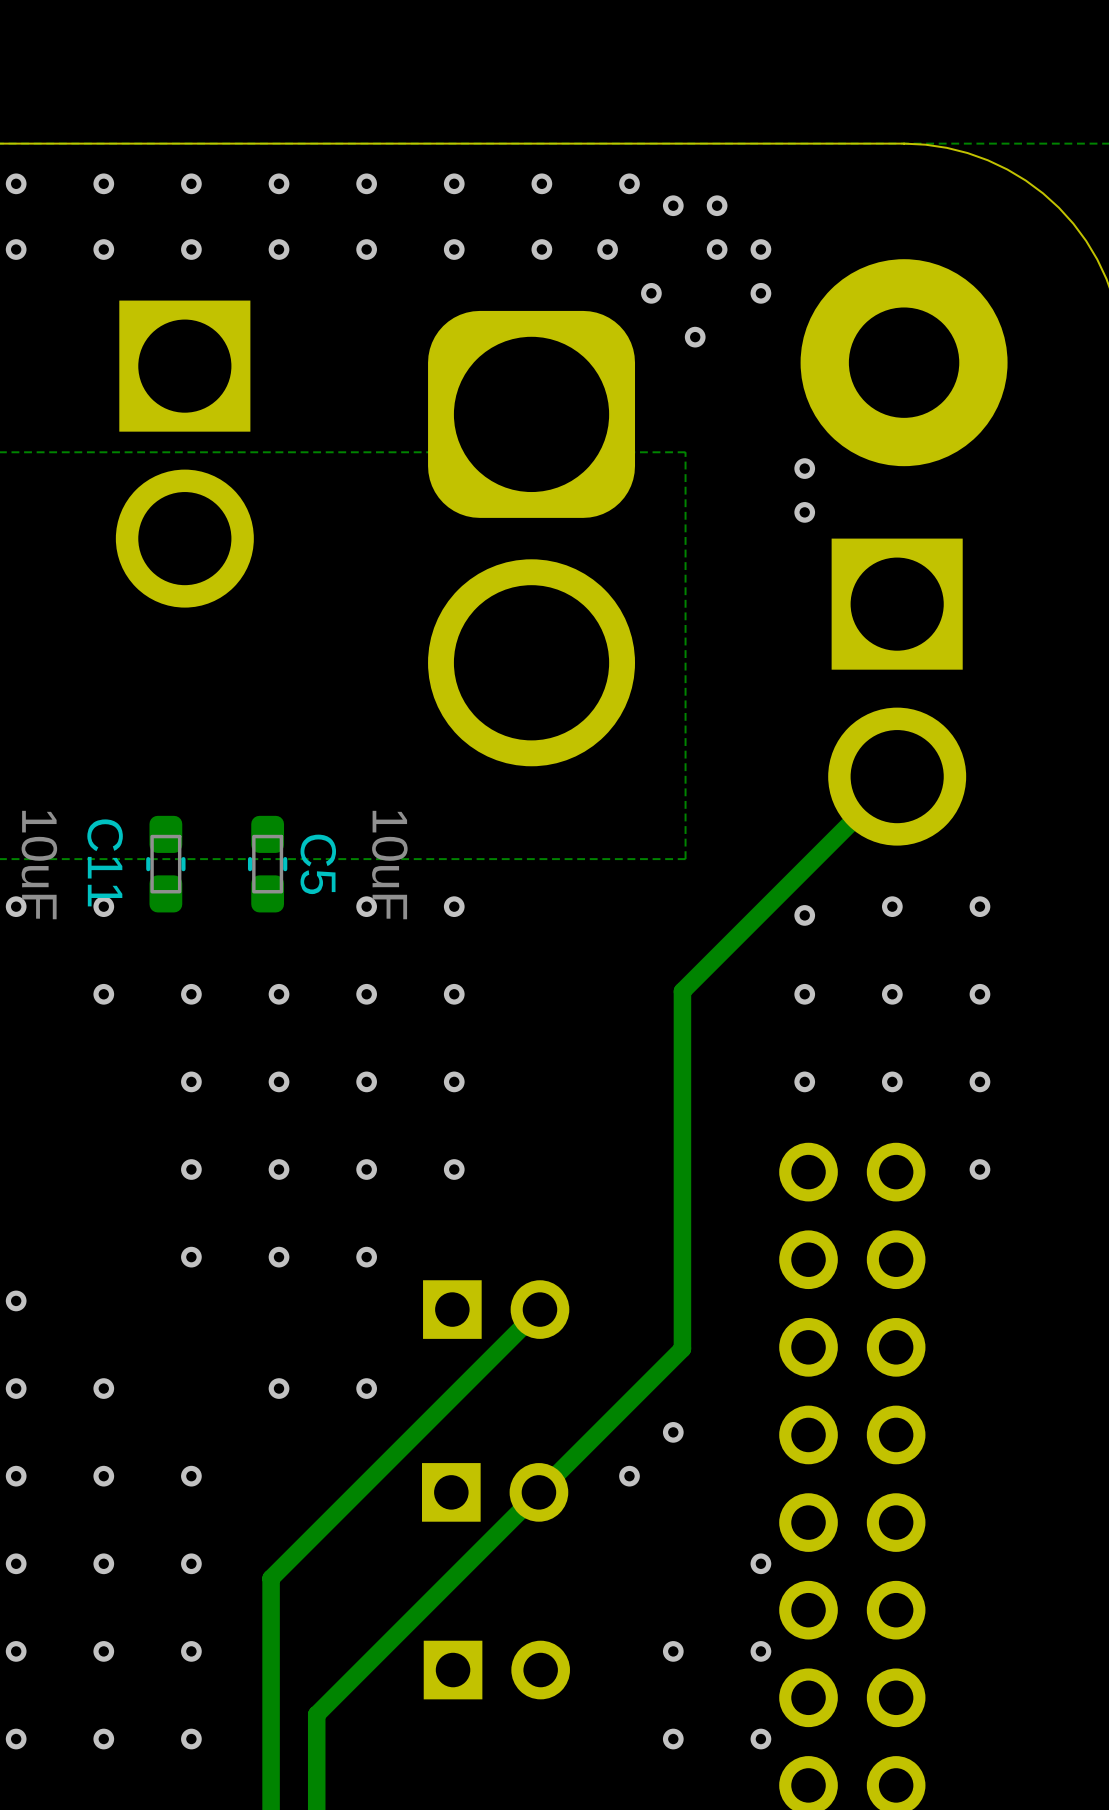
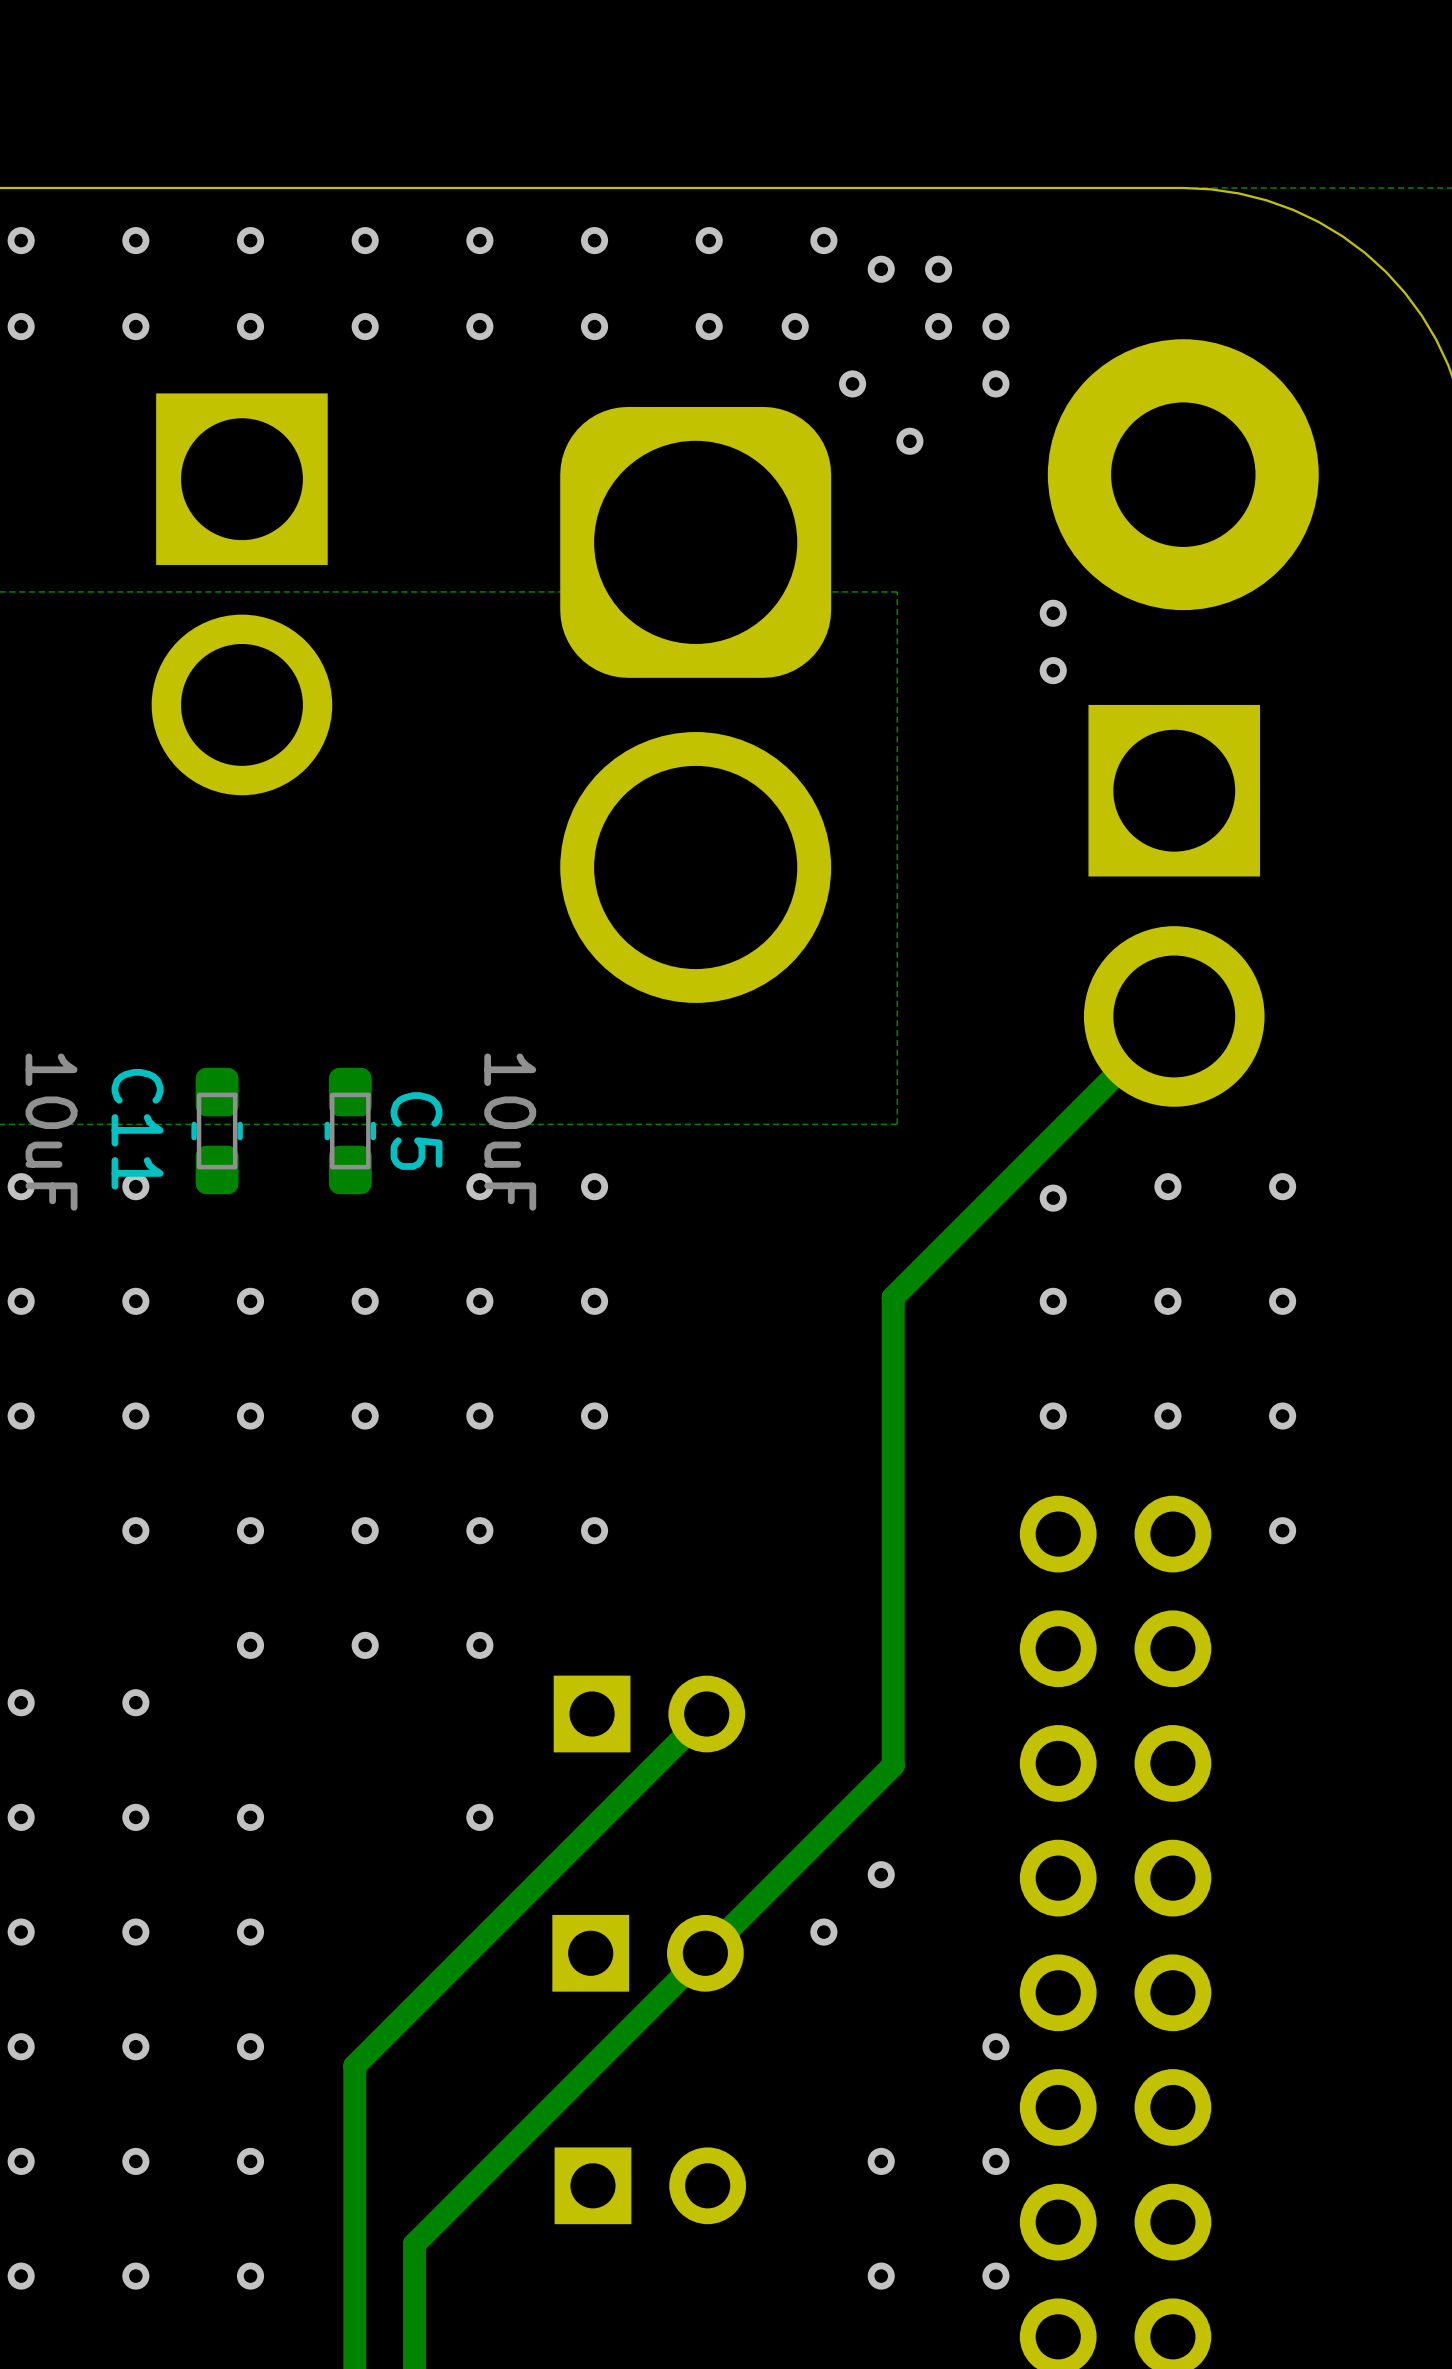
via: none -> (21, 1301)
via: none -> (21, 1416)
via: none -> (135, 1416)
via: none -> (135, 1530)
via: none -> (135, 1702)
via position: (279, 1388) -> (250, 1817)

